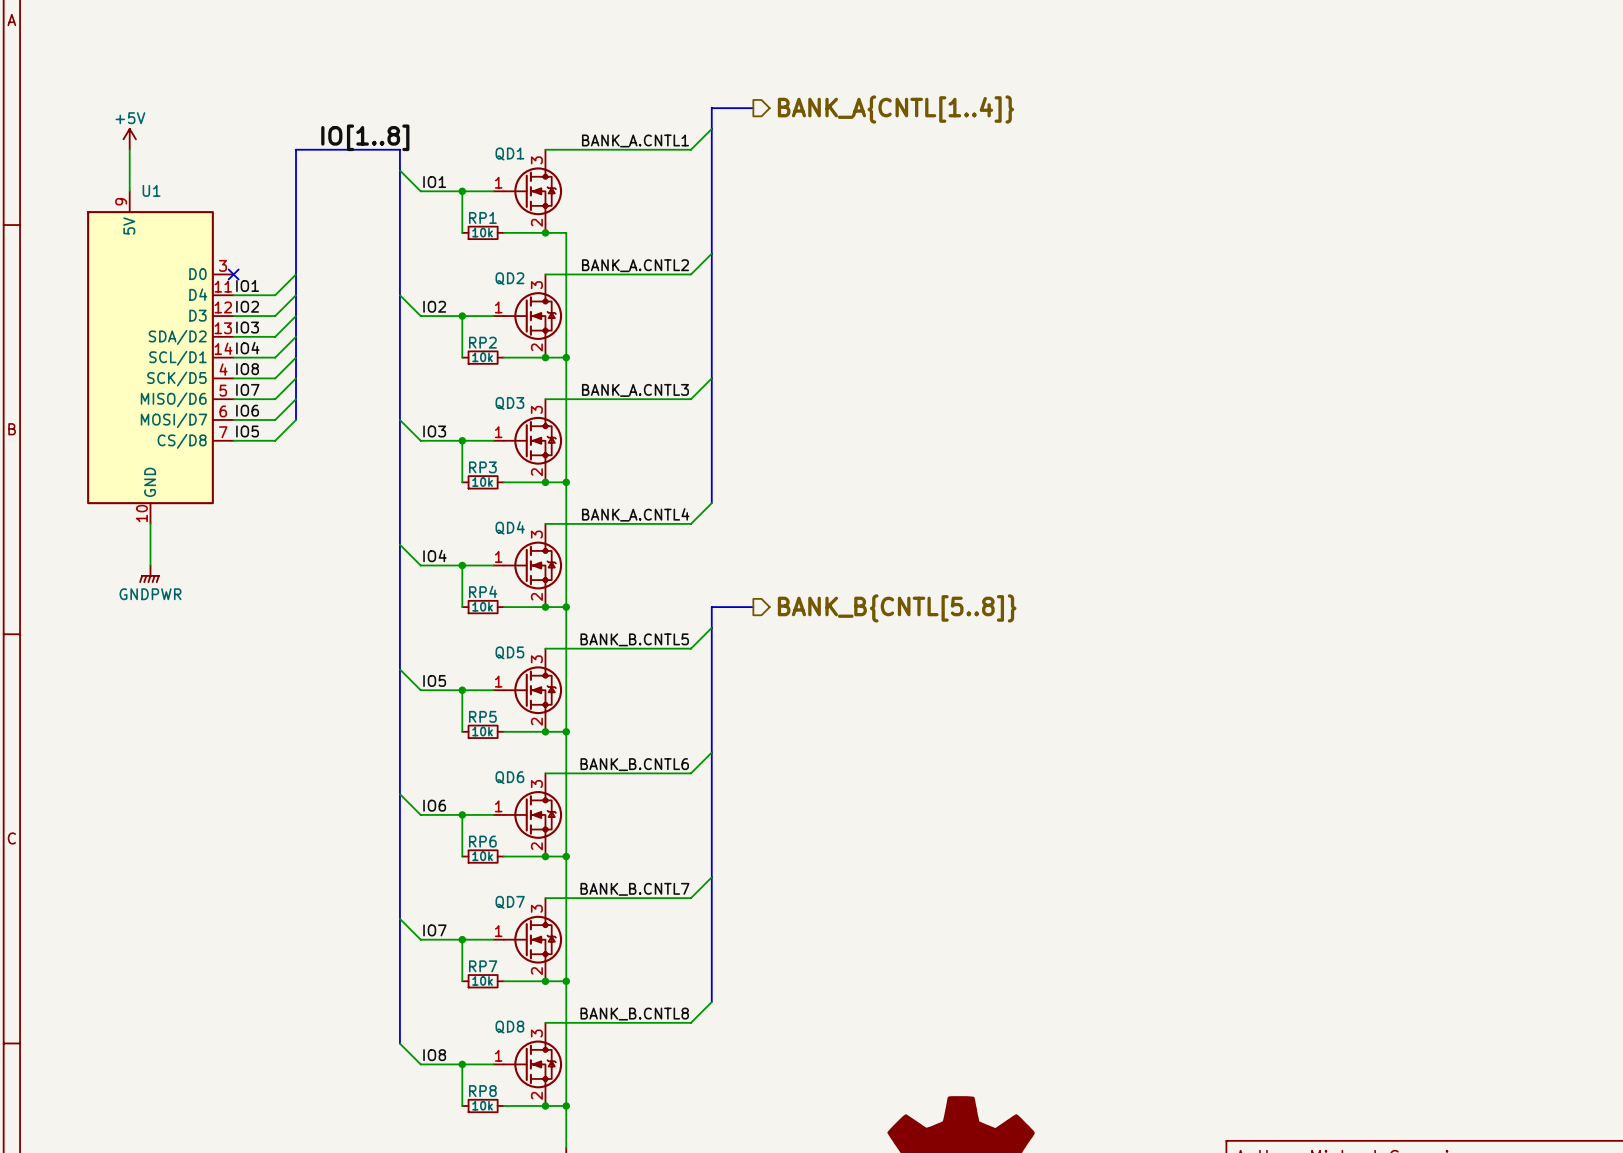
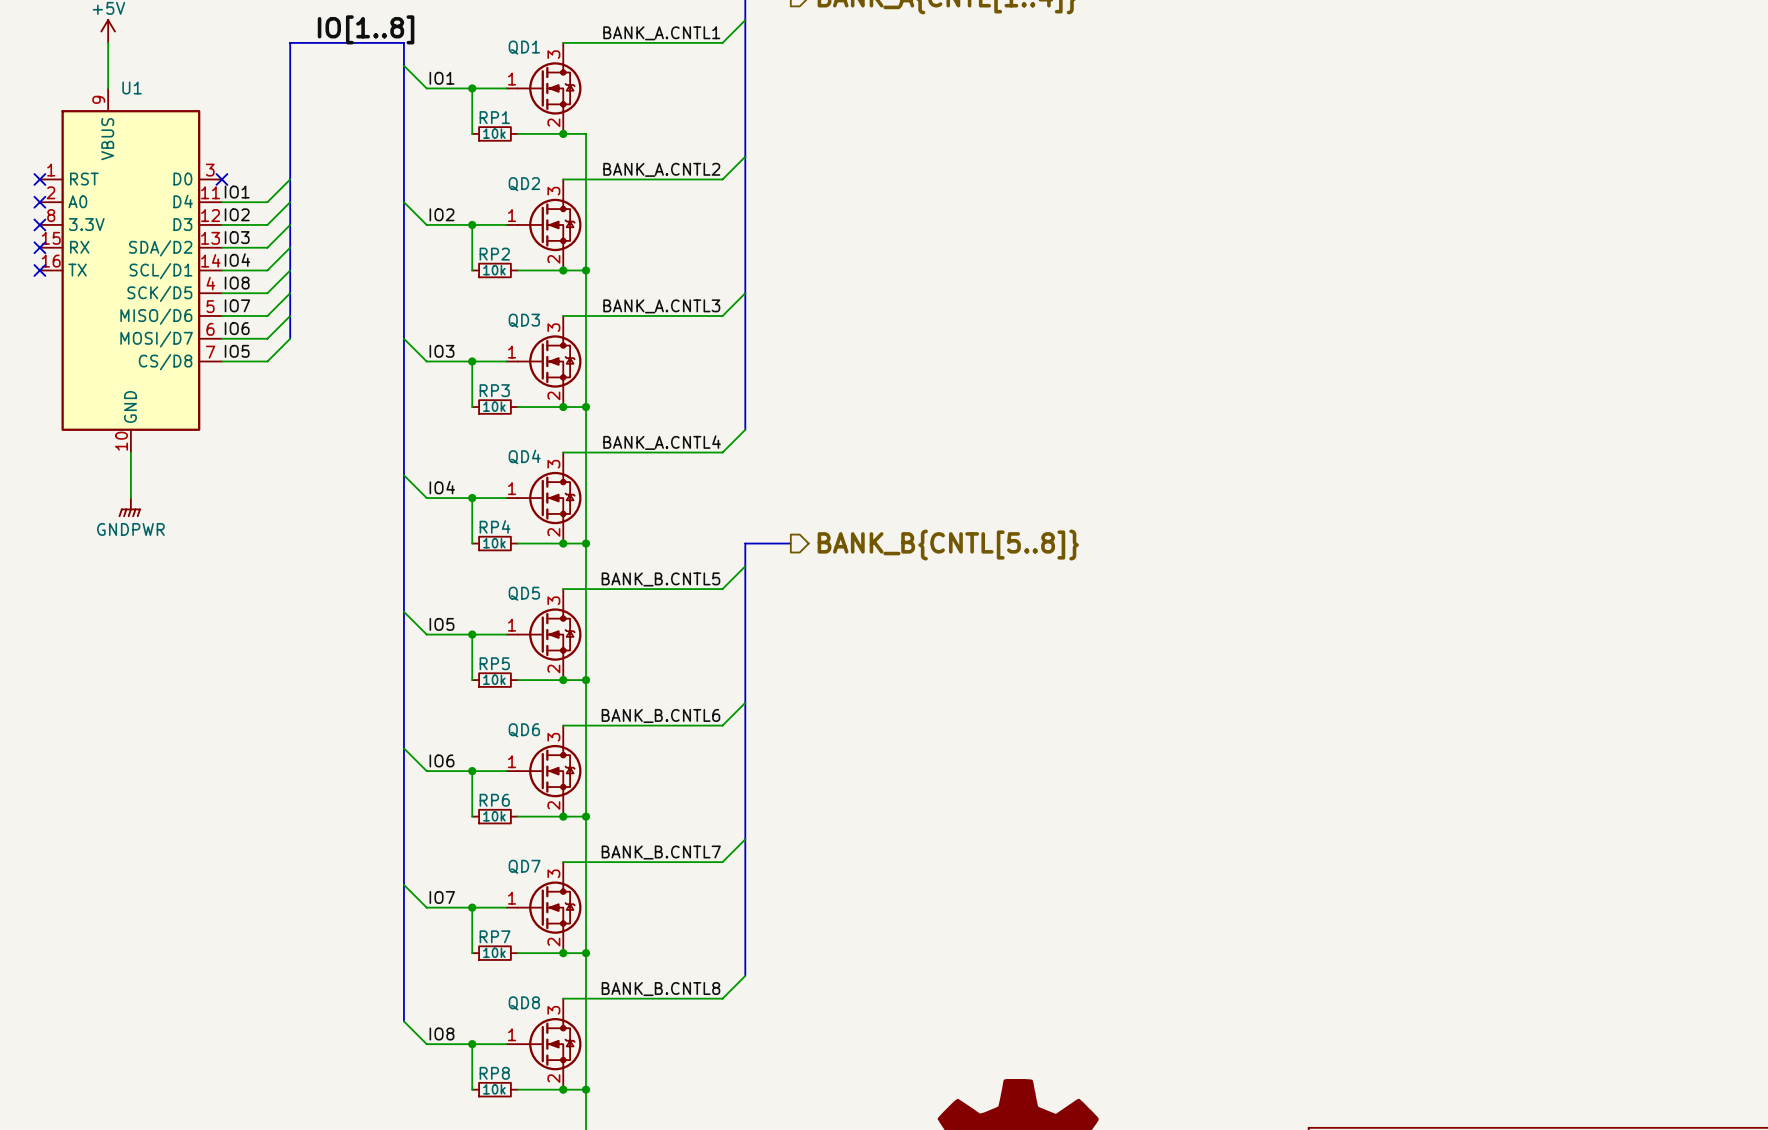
U1 symbol: [87, 191, 234, 524] -> [39, 88, 222, 453]
no-connect mark: none -> (39, 179)
no-connect mark: none -> (39, 202)
no-connect mark: none -> (39, 224)
no-connect mark: none -> (39, 247)
no-connect mark: none -> (39, 270)

